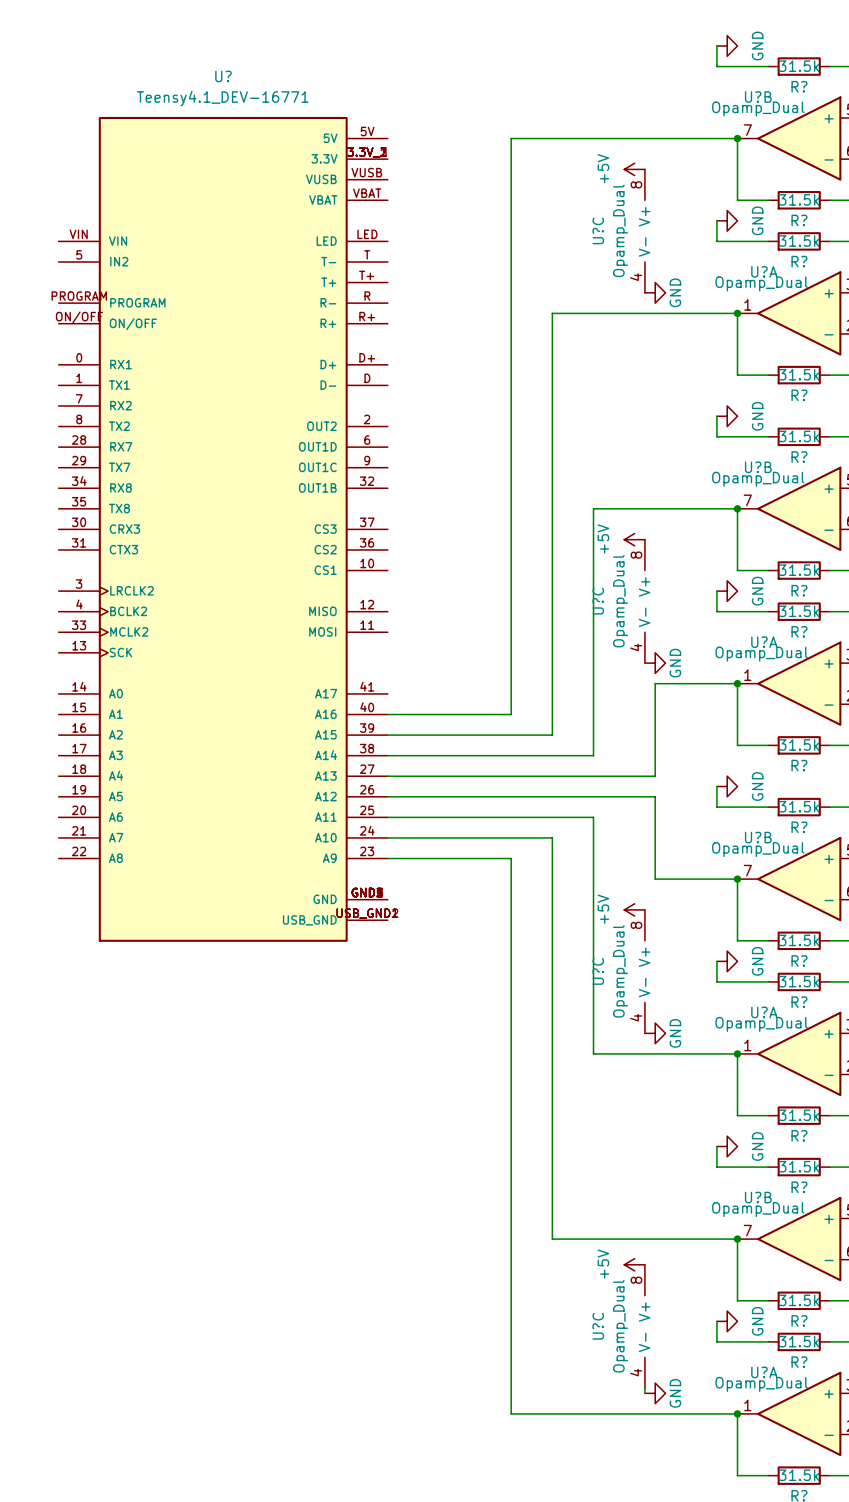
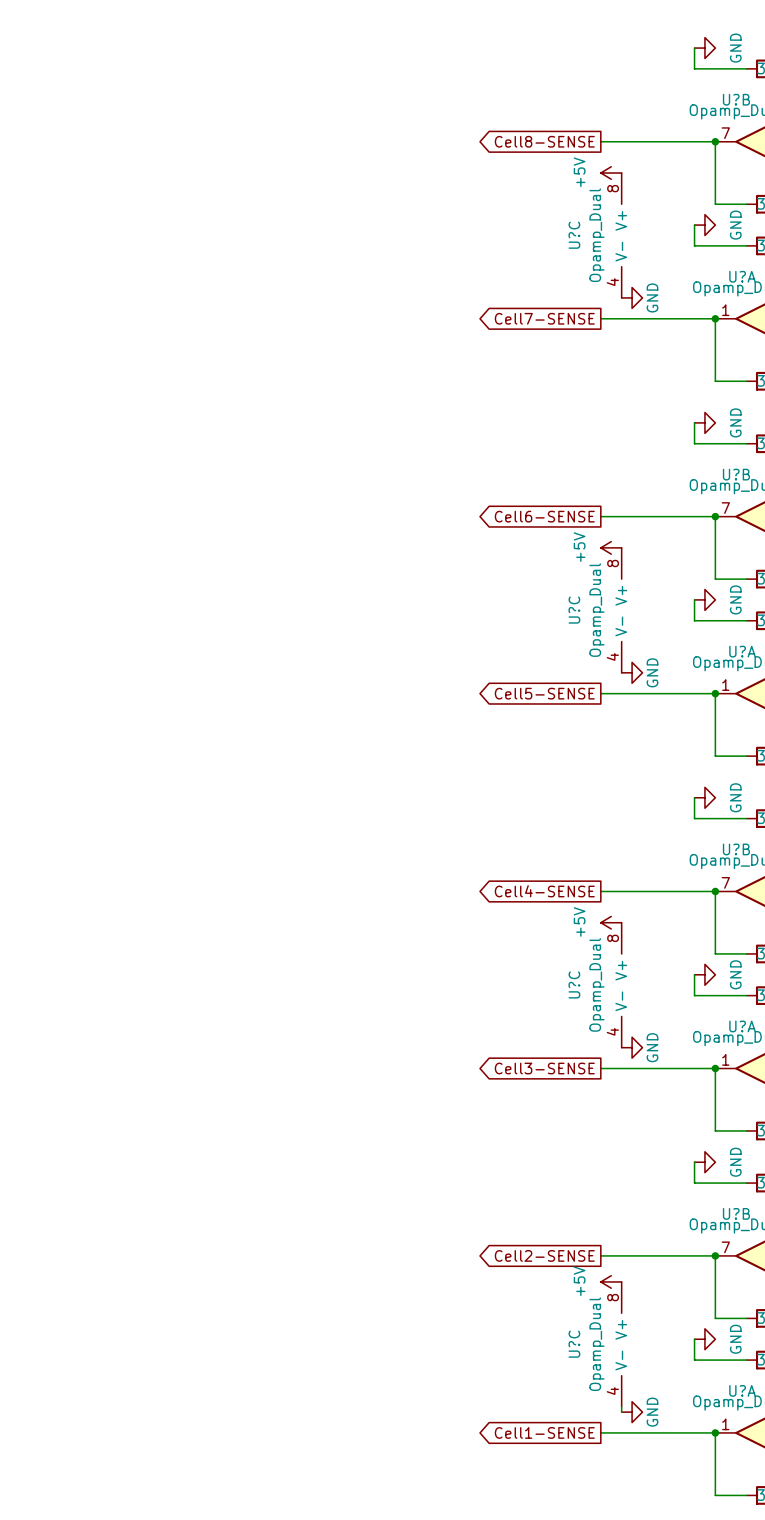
global label: none -> Cell8-SENSE (544, 141)
wire: (624, 138) (511, 138) (511, 714) (387, 714) -> none
global label: none -> Cell7-SENSE (544, 318)
wire: (624, 313) (552, 313) (552, 735) (387, 735) -> none
global label: none -> Cell6-SENSE (544, 516)
wire: (624, 508) (593, 508) (593, 755) (387, 755) -> none
U?: Teensy4.1_DEV-16771 (223, 529) -> none
global label: none -> Cell5-SENSE (544, 693)
wire: (655, 683) (655, 776) (387, 776) -> (632, 693) (600, 693)
wire: (387, 796) (655, 796) (655, 879) -> (600, 891) (632, 891)
wire: (387, 817) (593, 817) (593, 1053) (624, 1053) -> none
wire: (387, 837) (552, 837) (552, 1239) (624, 1239) -> none
wire: (387, 858) (511, 858) (511, 1413) (624, 1413) -> none
global label: none -> Cell4-SENSE (544, 891)
global label: none -> Cell3-SENSE (544, 1068)
global label: none -> Cell2-SENSE (544, 1255)
global label: none -> Cell1-SENSE (544, 1432)

